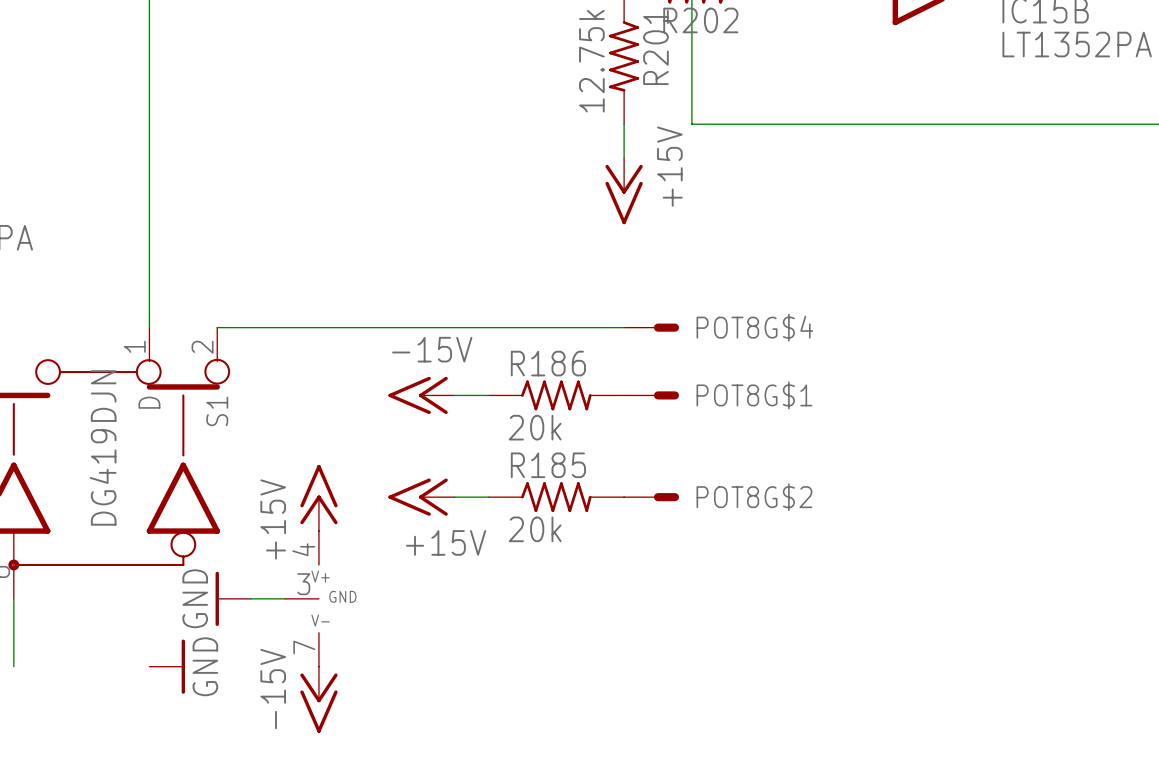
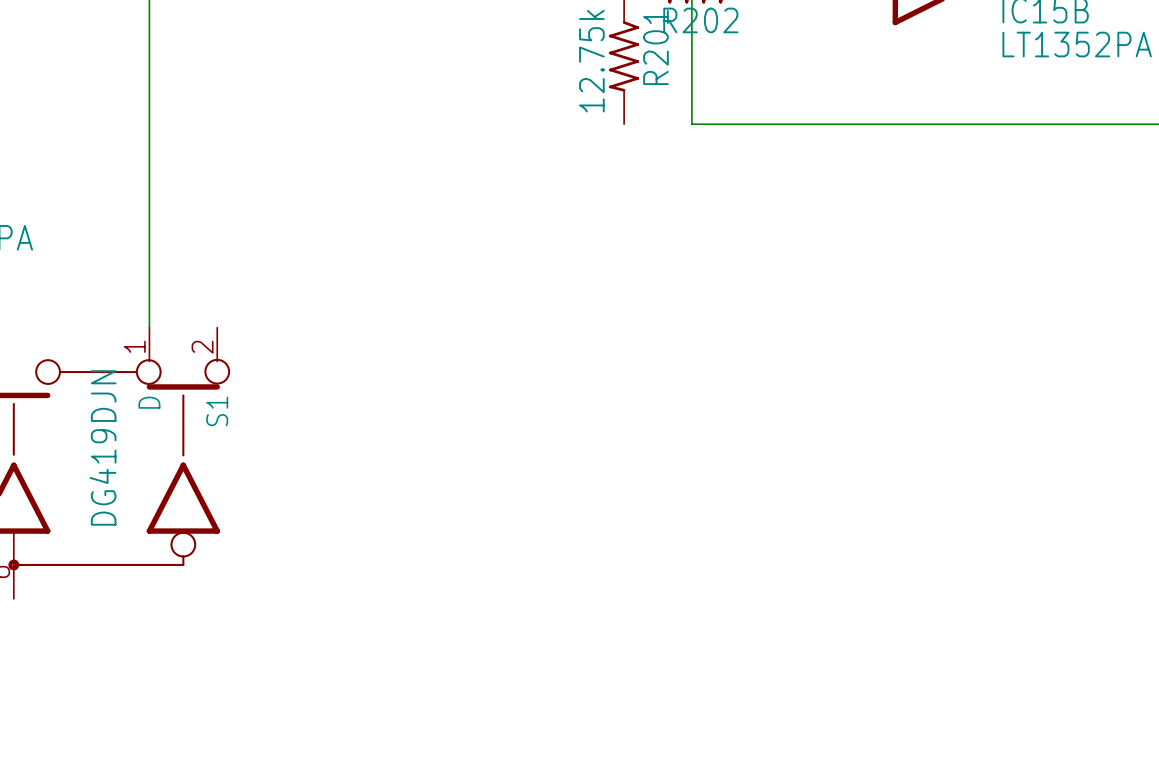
wire: (624, 124) (624, 158) -> none
power symbol: +15V (624, 191) -> none
wire: (217, 327) (624, 327) -> none
POT8G$4: (651, 327) -> none
power symbol: -15V (421, 395) -> none
wire: (454, 395) (488, 395) -> none
R186: 20k (556, 395) -> none
POT8G$1: (651, 395) -> none
power symbol: +15V (421, 497) -> none
wire: (454, 497) (488, 497) -> none
R185: 20k (556, 497) -> none
POT8G$2: (651, 497) -> none
power symbol: +15V (318, 498) -> none
wire: (13, 598) (13, 666) -> none
power symbol: GND (233, 598) -> none
wire: (251, 598) (285, 598) -> none
part: (302, 598) -> none
power symbol: GND (167, 666) -> none
power symbol: -15V (318, 699) -> none

